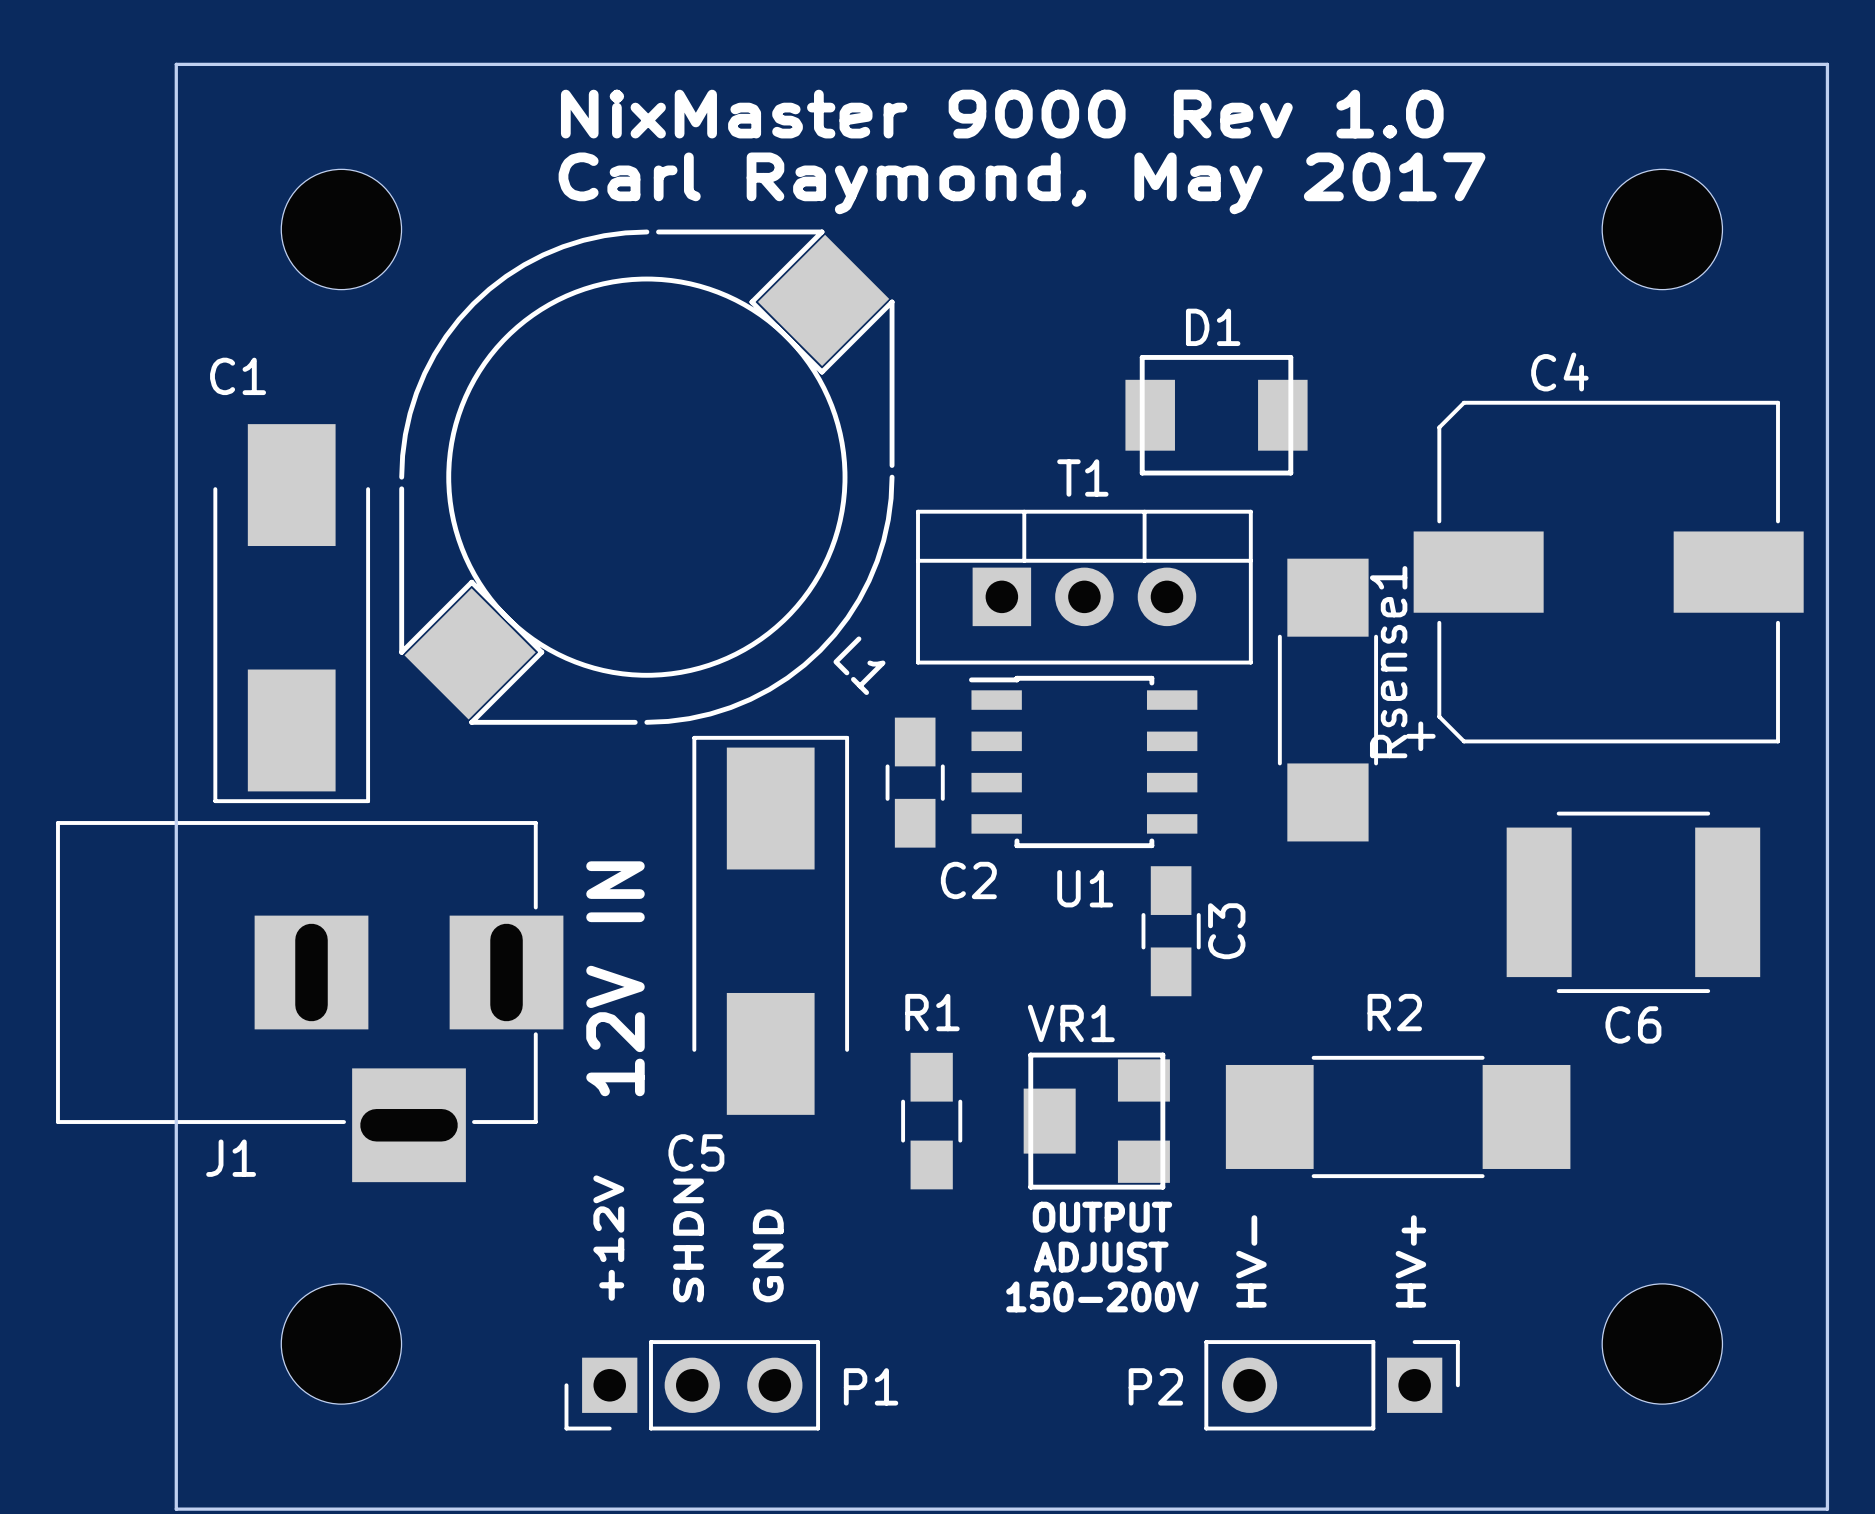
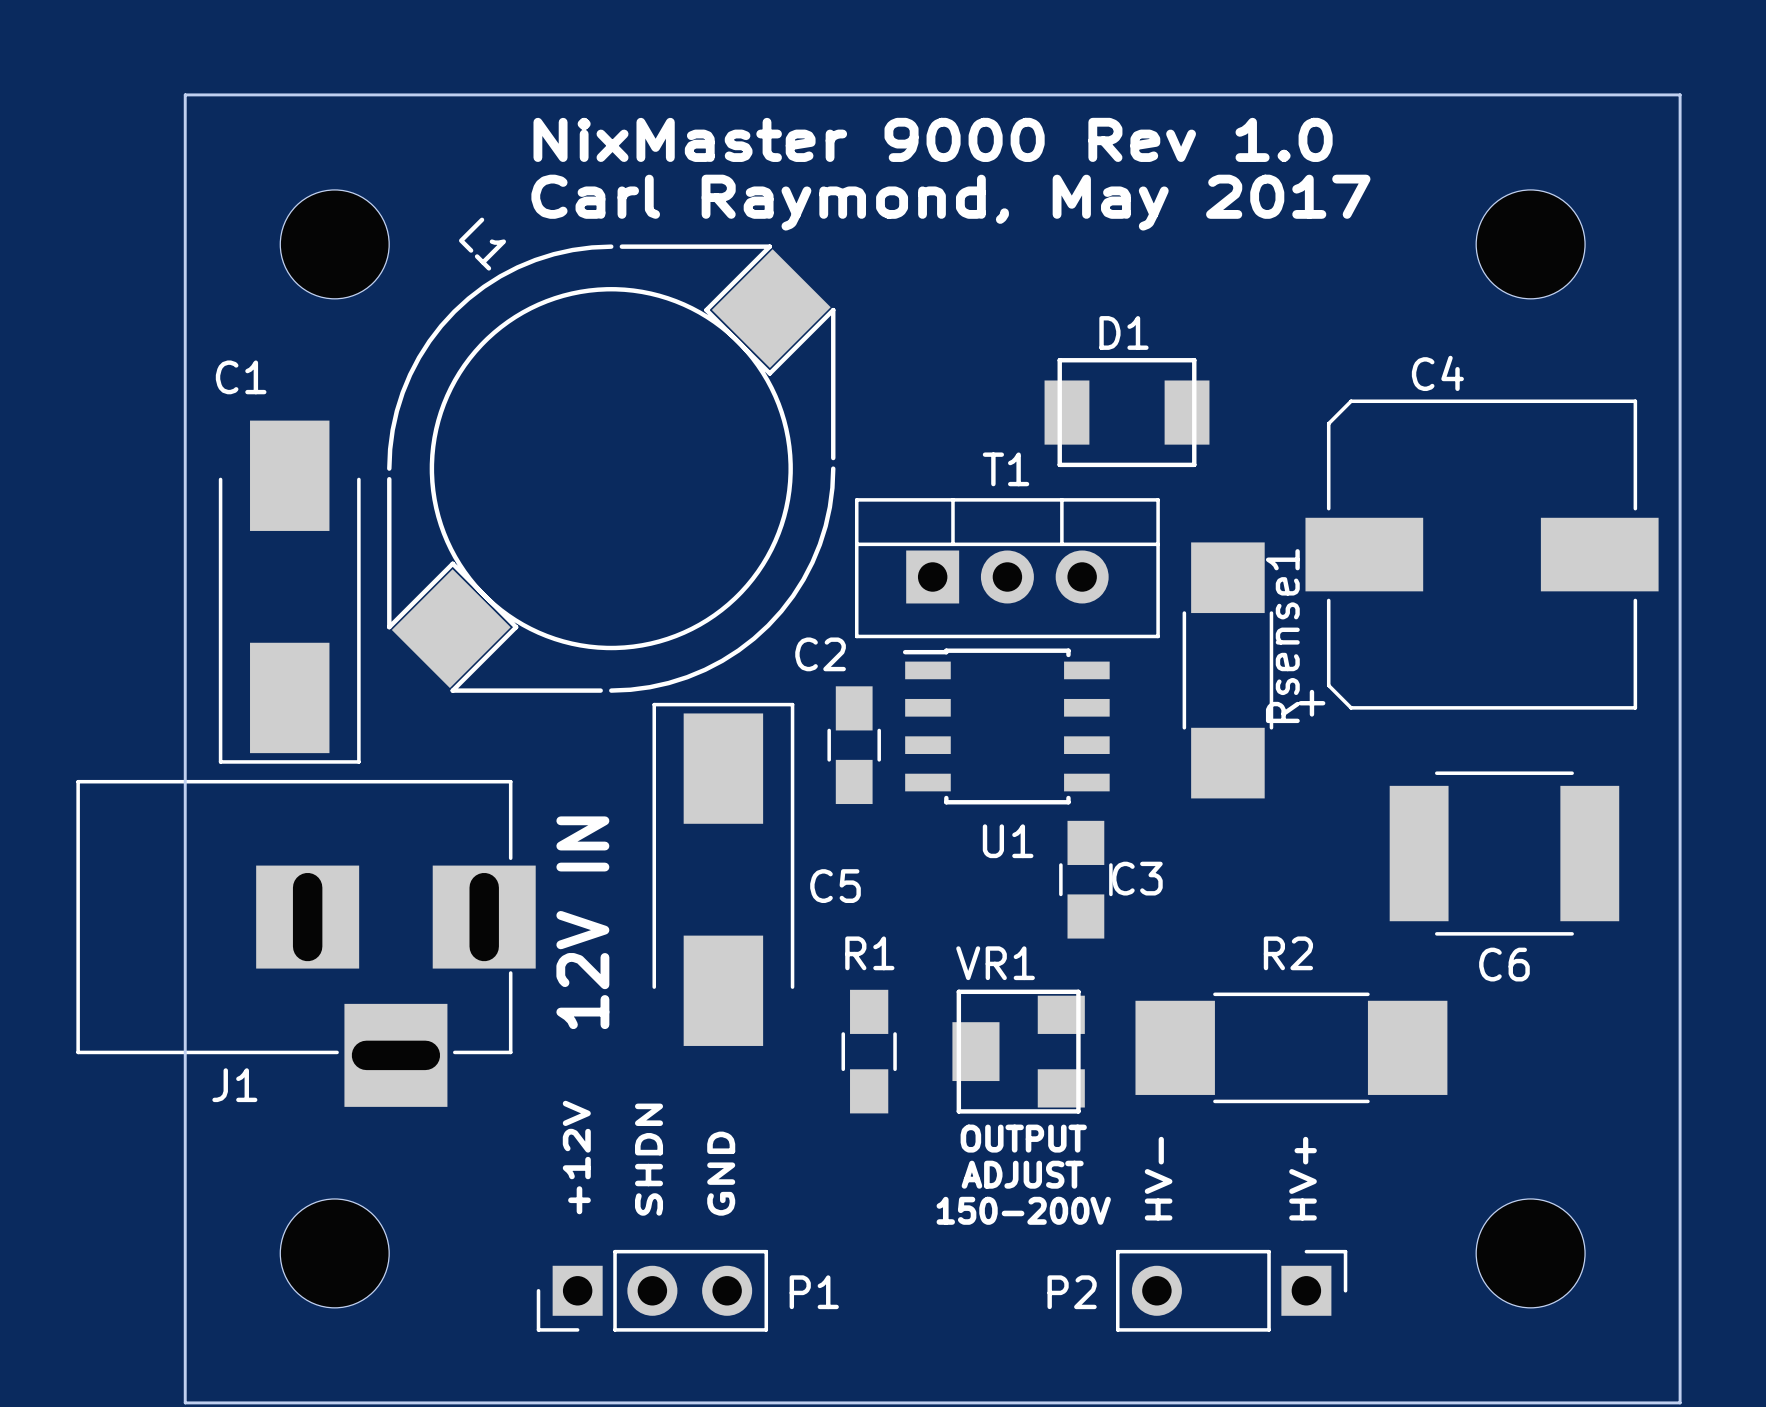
L1 name position: L1 (859, 665) -> L1 (482, 244)
C2 name position: C2 (968, 880) -> C2 (820, 654)
C3 name rotation: 0° (1226, 931) -> 90° clockwise (1137, 878)
C5 name position: C5 (696, 1152) -> C5 (835, 886)

